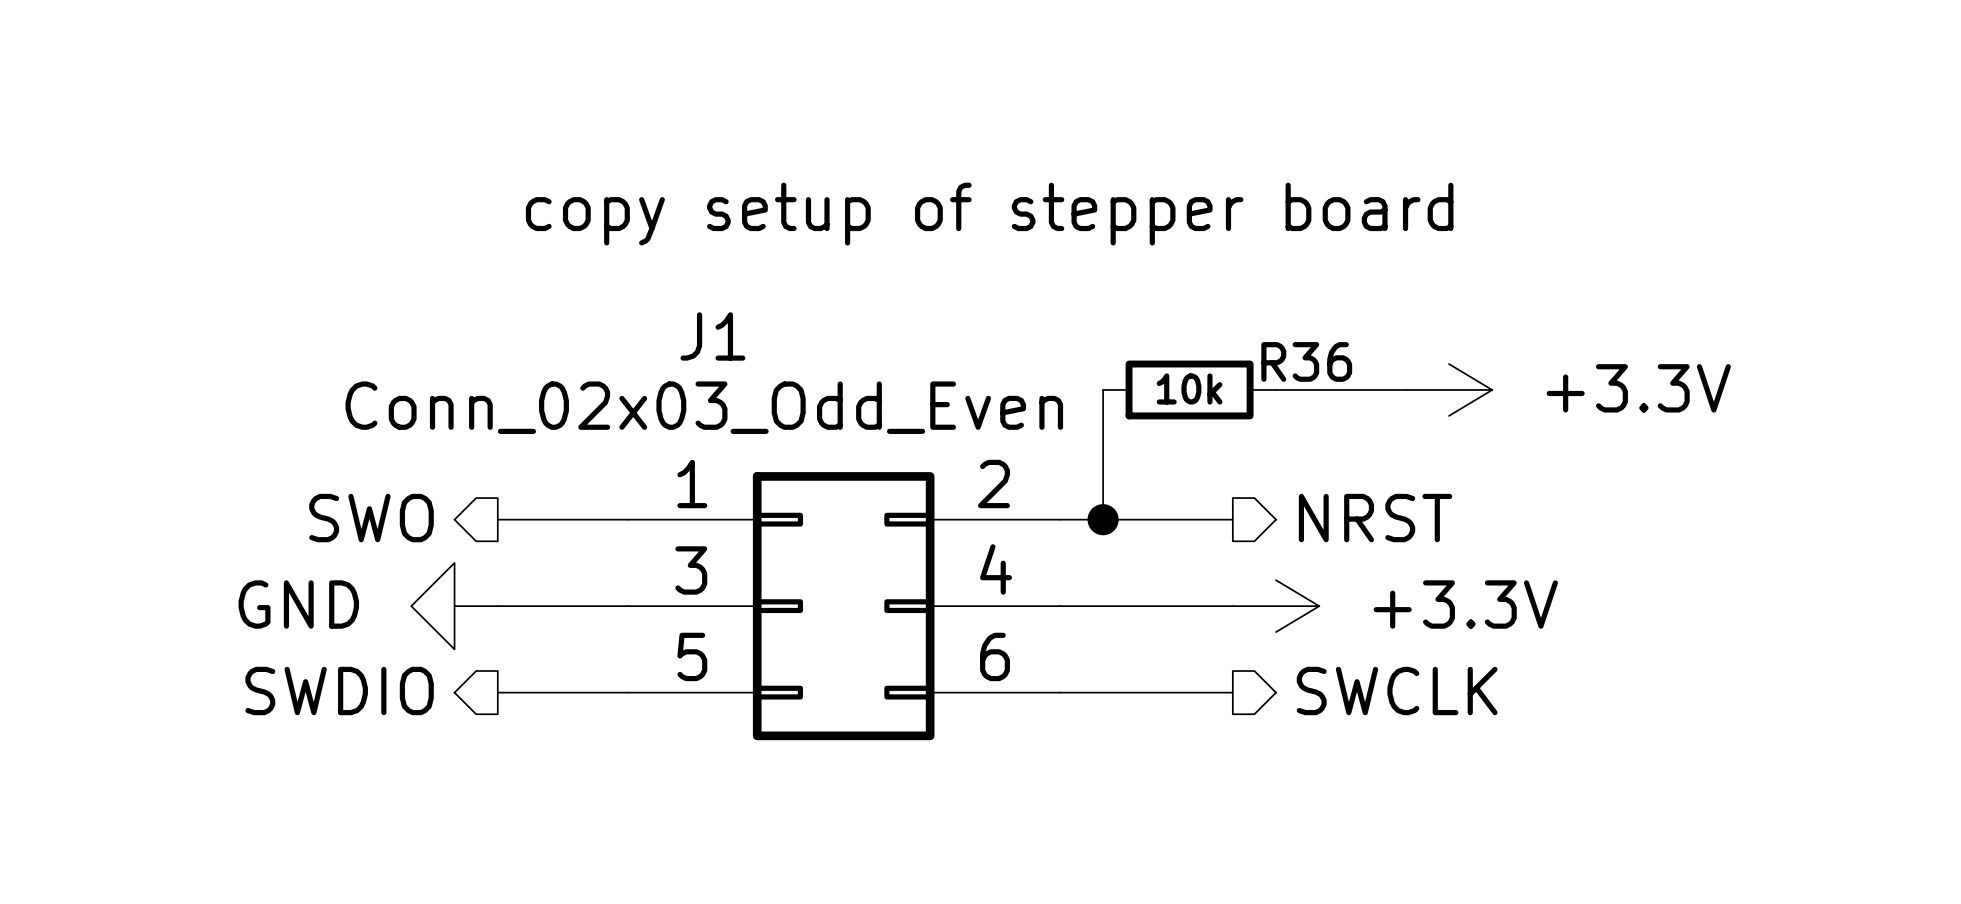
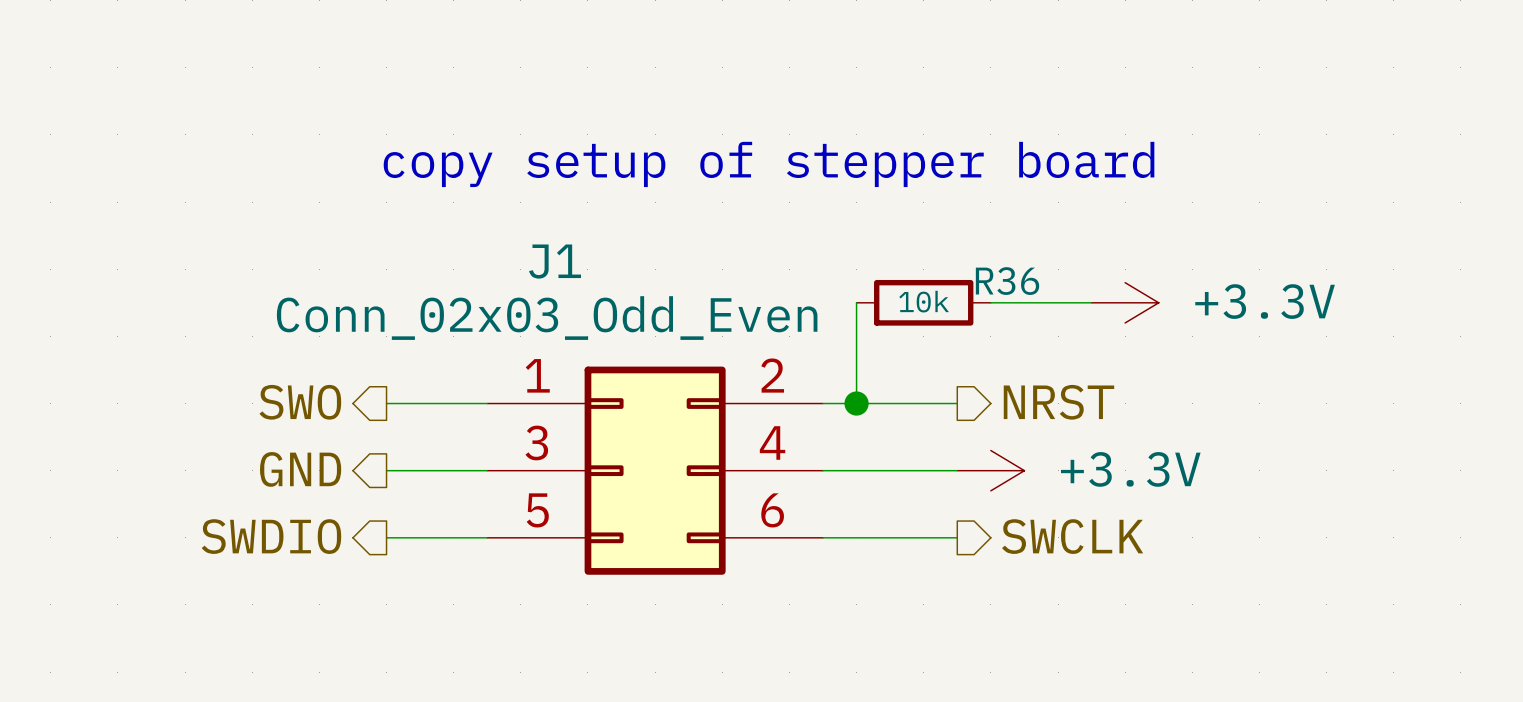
hierarchical label: none -> GND (300, 469)
power symbol: GND (454, 606) -> none

